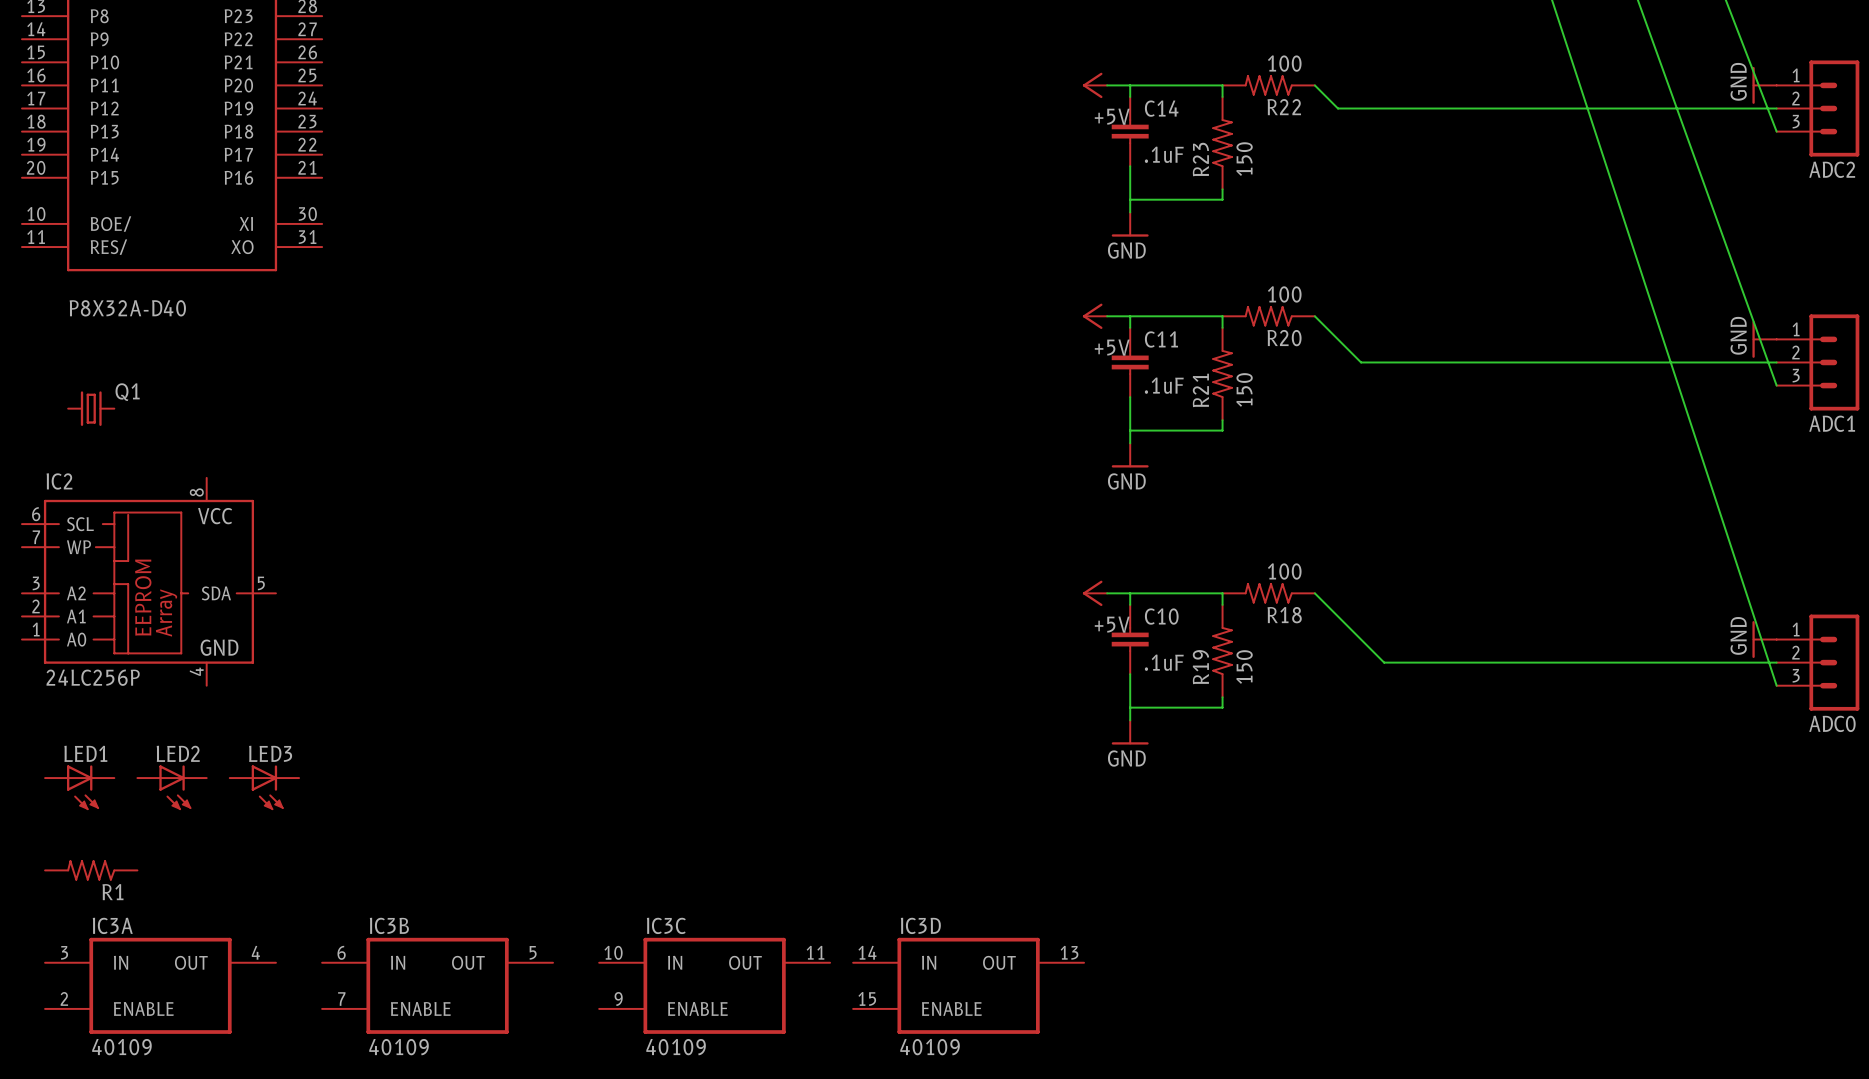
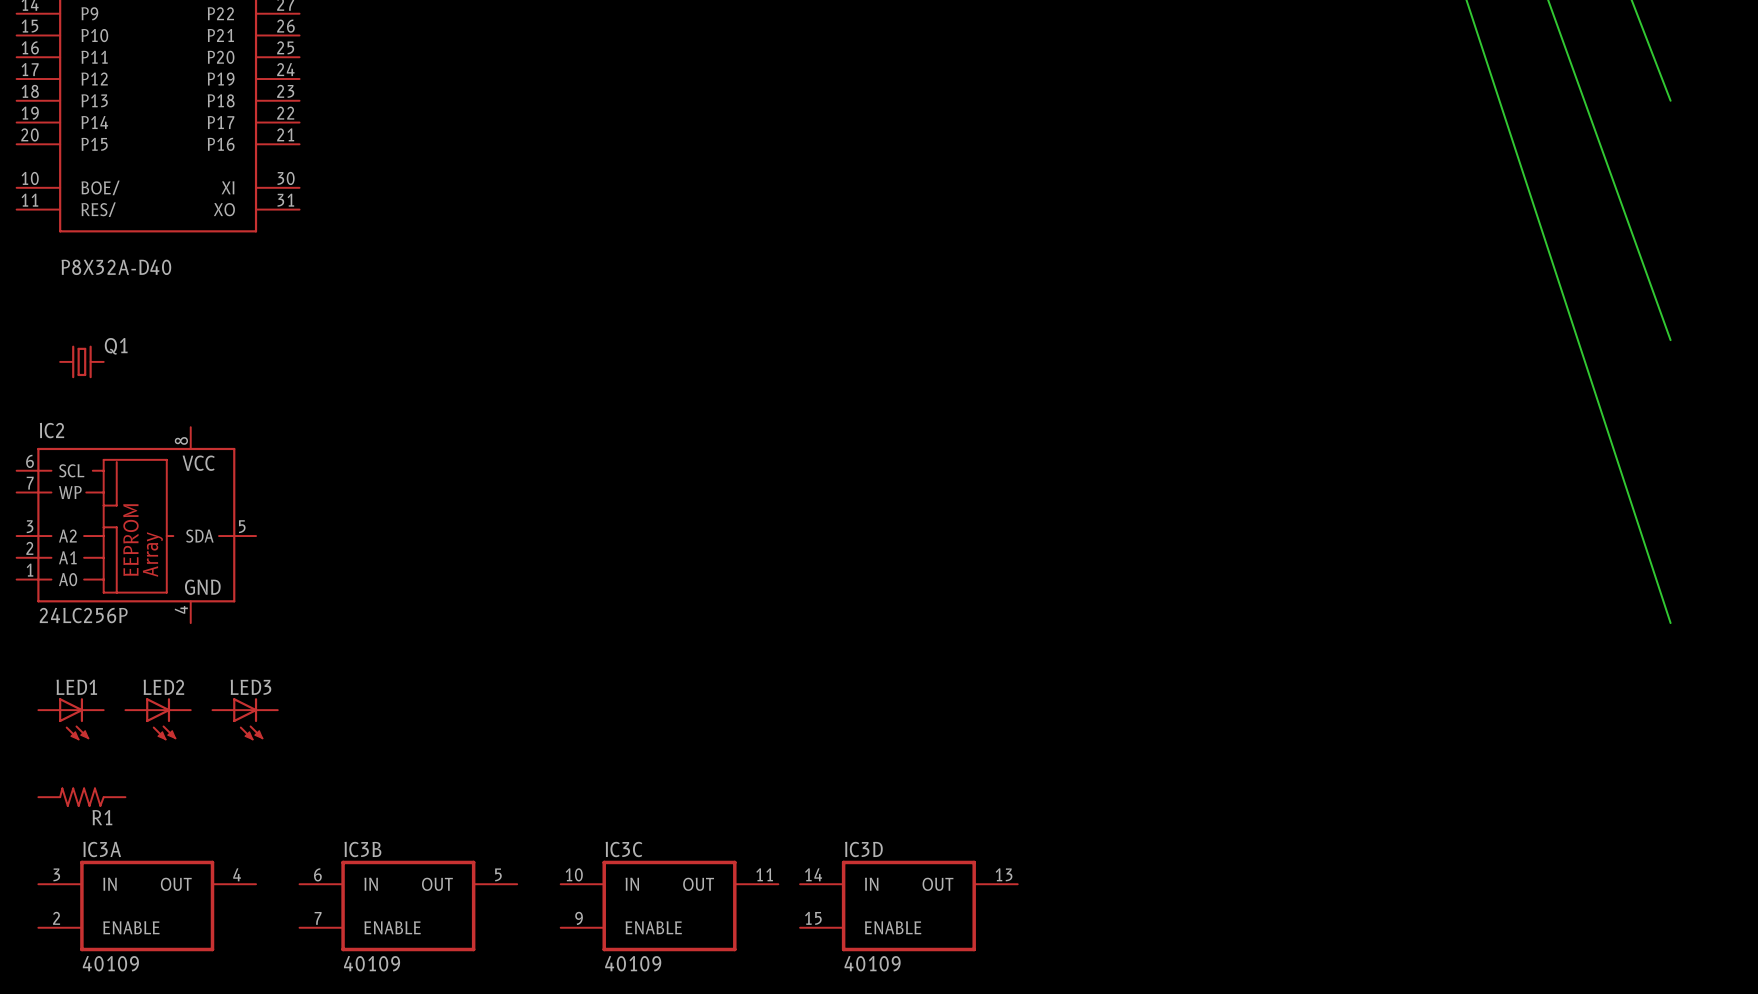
power symbol: +5V (1094, 85) -> none
wire: (1107, 85) (1222, 85) (1222, 96) -> none
wire: (1130, 85) (1130, 96) -> none
R22: 100 (1268, 85) -> none
wire: (1314, 85) (1337, 108) (1776, 108) -> none
power symbol: GND (1764, 85) -> none
ADC2: (1817, 108) -> none
C14: .1uF (1130, 131) -> none
R23: 150 (1222, 143) -> none
wire: (1130, 166) (1130, 212) -> none
wire: (1222, 189) (1222, 199) (1130, 199) -> none
power symbol: GND (1130, 224) -> none
power symbol: +5V (1094, 316) -> none
wire: (1107, 316) (1222, 316) (1222, 327) -> none
wire: (1130, 316) (1130, 327) -> none
R20: 100 (1268, 316) -> none
wire: (1314, 316) (1361, 362) (1776, 362) -> none
power symbol: GND (1764, 339) -> none
C11: .1uF (1130, 362) -> none
ADC1: (1817, 362) -> none
R21: 150 (1222, 374) -> none
wire: (1130, 397) (1130, 443) -> none
wire: (1222, 420) (1222, 430) (1130, 430) -> none
power symbol: GND (1130, 455) -> none
power symbol: +5V (1094, 593) -> none
wire: (1107, 593) (1222, 593) (1222, 604) -> none
wire: (1130, 593) (1130, 604) -> none
R18: 100 (1268, 593) -> none
wire: (1314, 593) (1384, 662) (1776, 662) -> none
C10: .1uF (1130, 639) -> none
power symbol: GND (1764, 639) -> none
R19: 150 (1222, 651) -> none
ADC0: (1817, 662) -> none
wire: (1130, 674) (1130, 720) -> none
wire: (1222, 697) (1222, 707) (1130, 707) -> none
power symbol: GND (1130, 732) -> none

